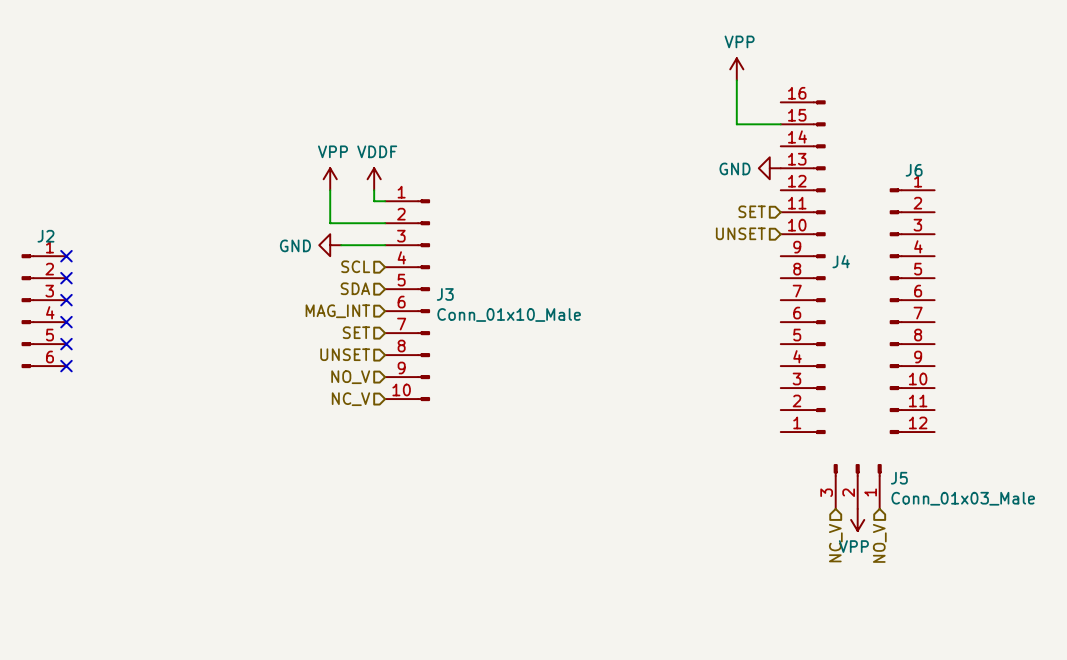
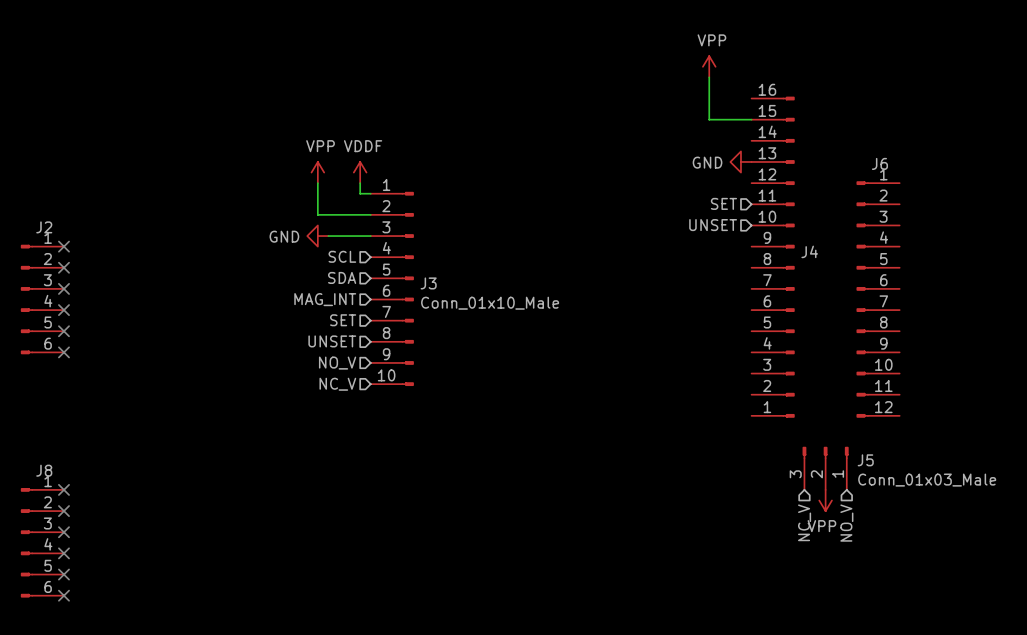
no-connect mark: none -> (63, 489)
no-connect mark: none -> (63, 511)
no-connect mark: none -> (63, 532)
J8: none -> (42, 542)
no-connect mark: none -> (63, 553)
no-connect mark: none -> (63, 574)
no-connect mark: none -> (63, 595)

